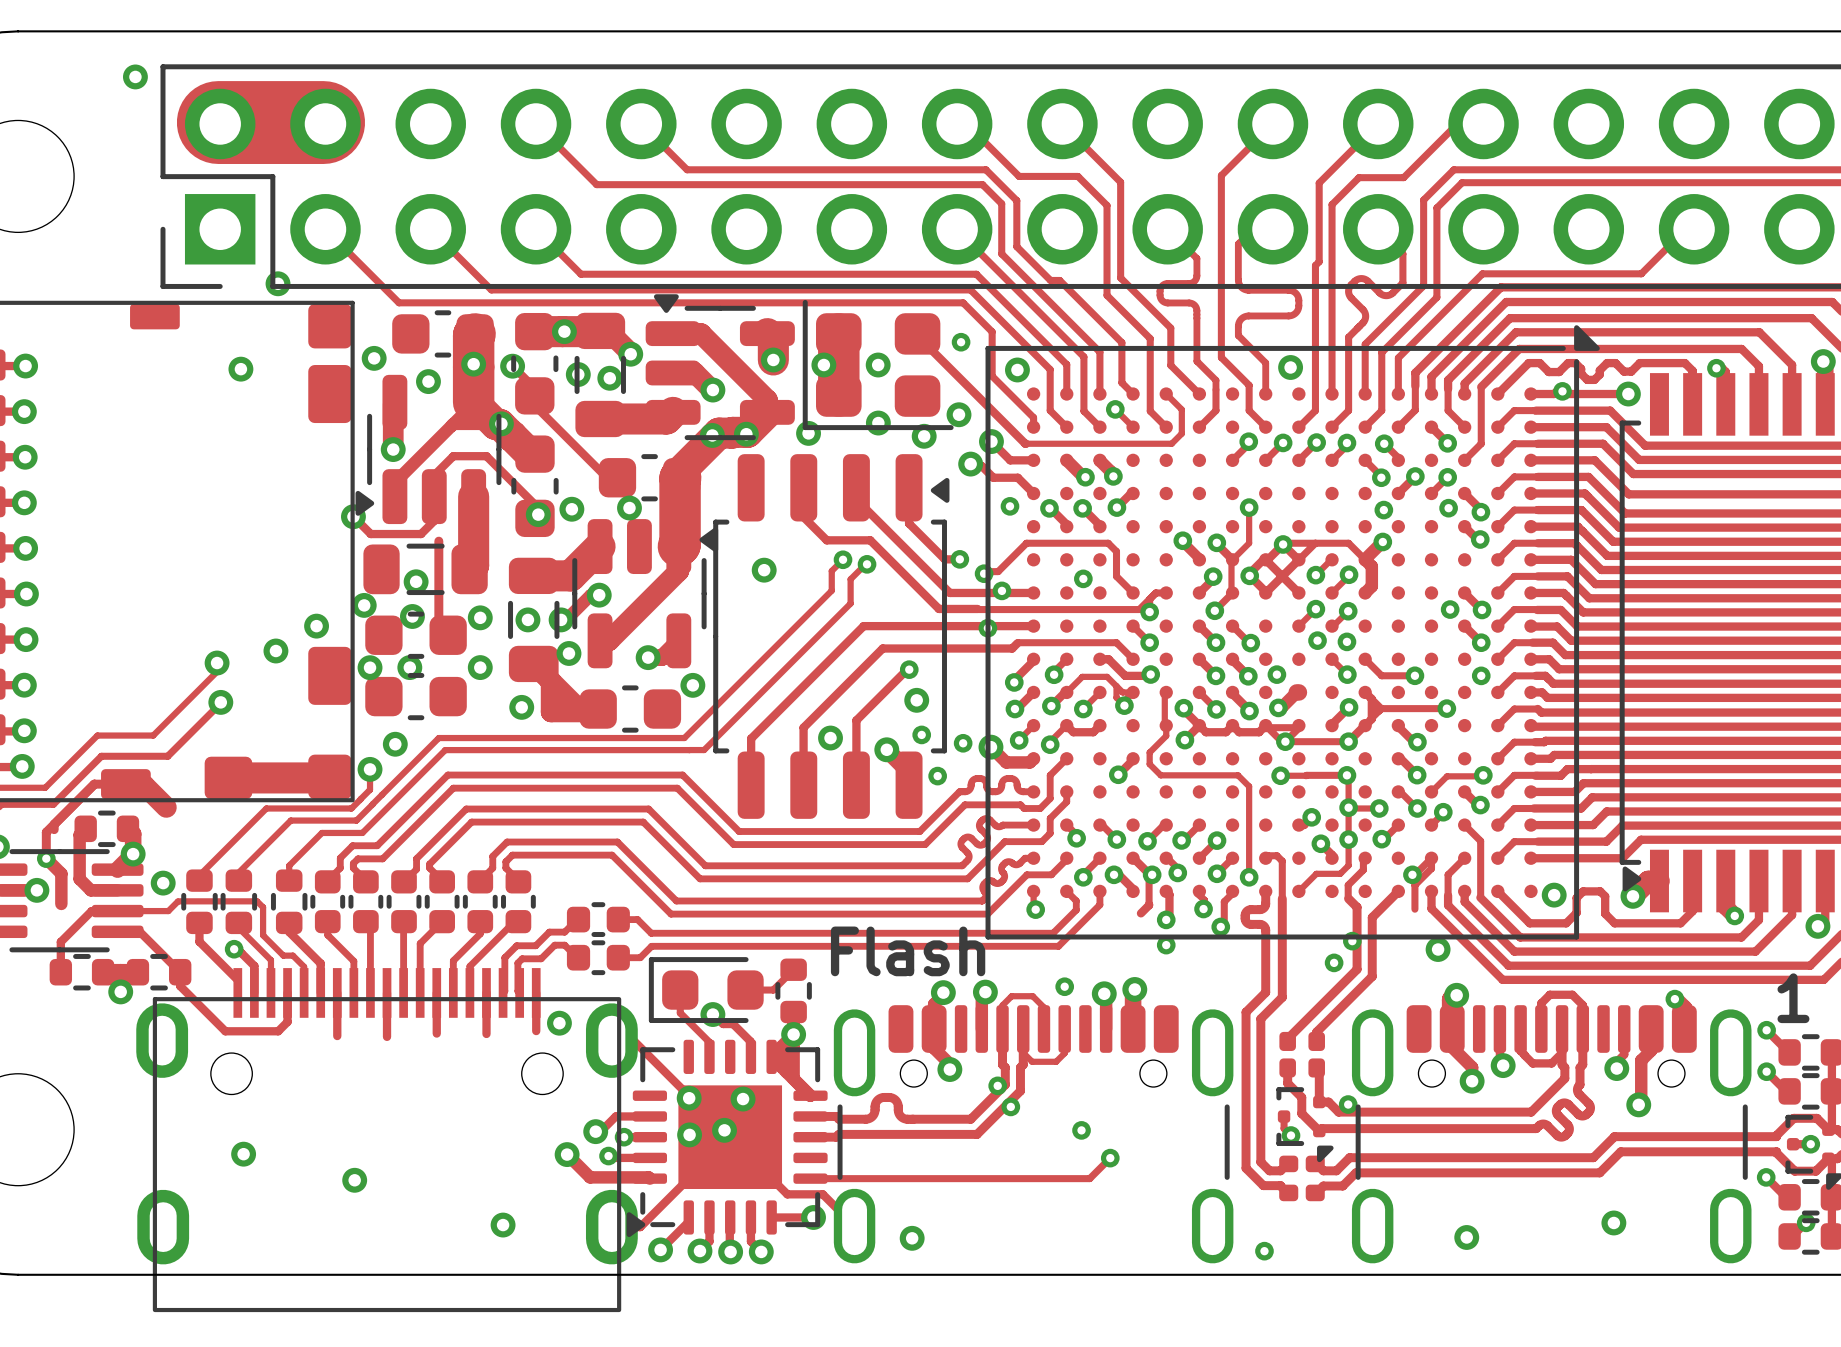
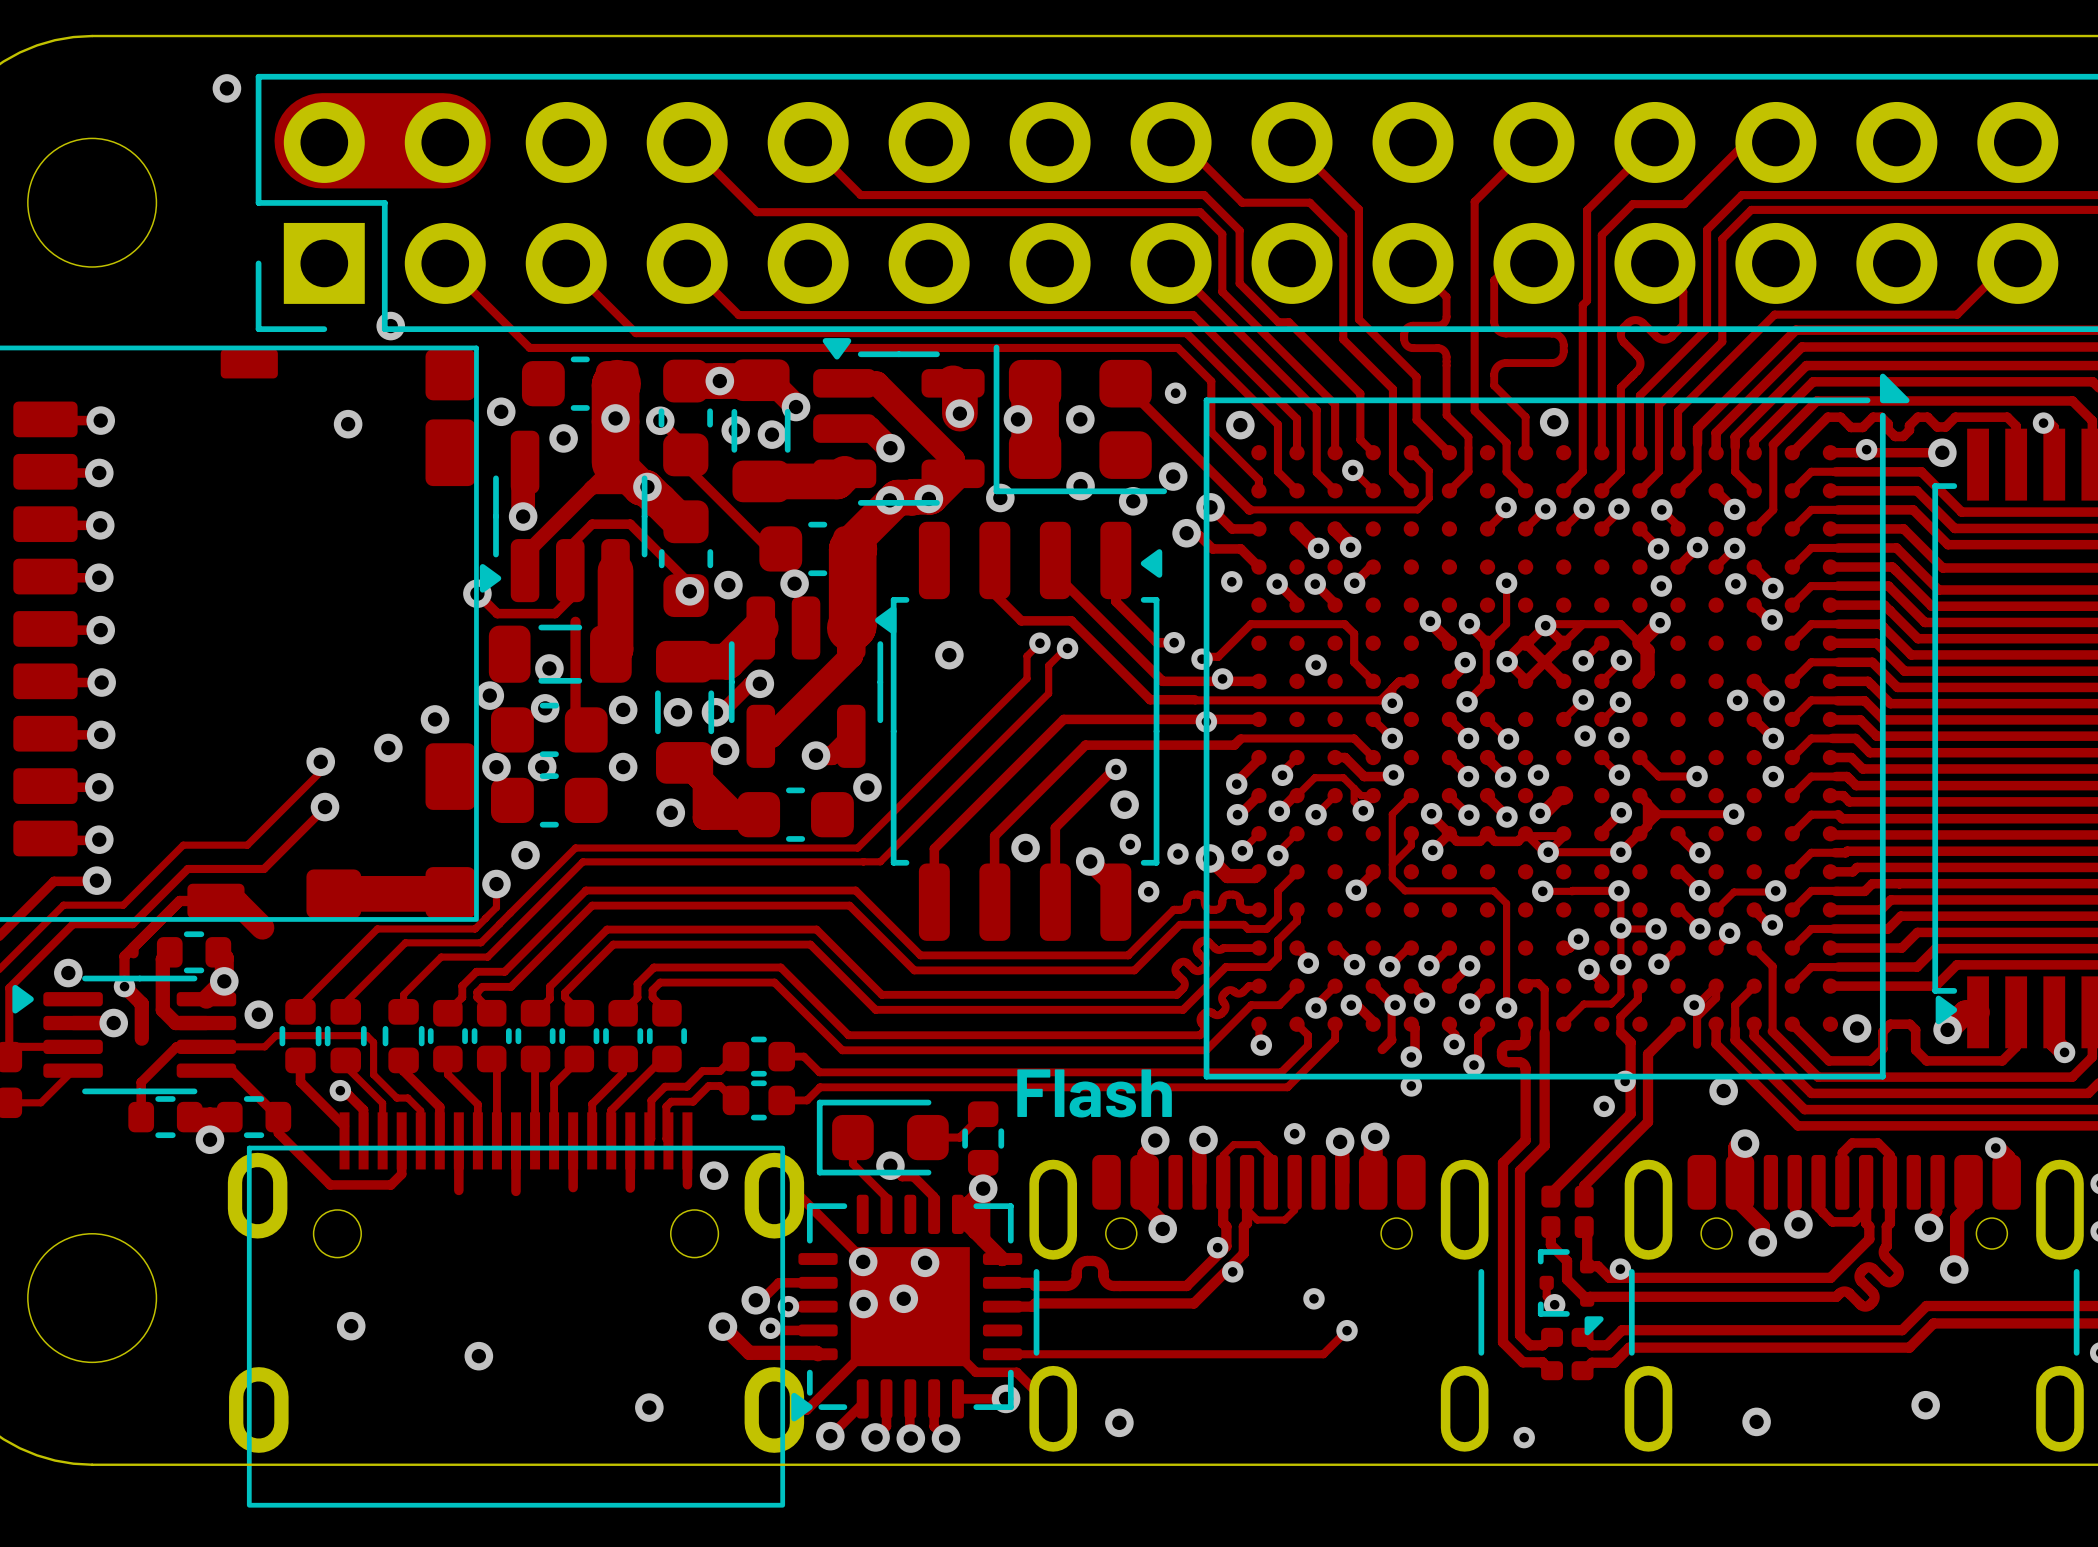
track: none -> (1410, 795) (1392, 814) (1392, 864)
track: (1164, 693) (1164, 724) -> none
track: (1066, 725) (1073, 732) (1093, 732) (1099, 725) -> none

